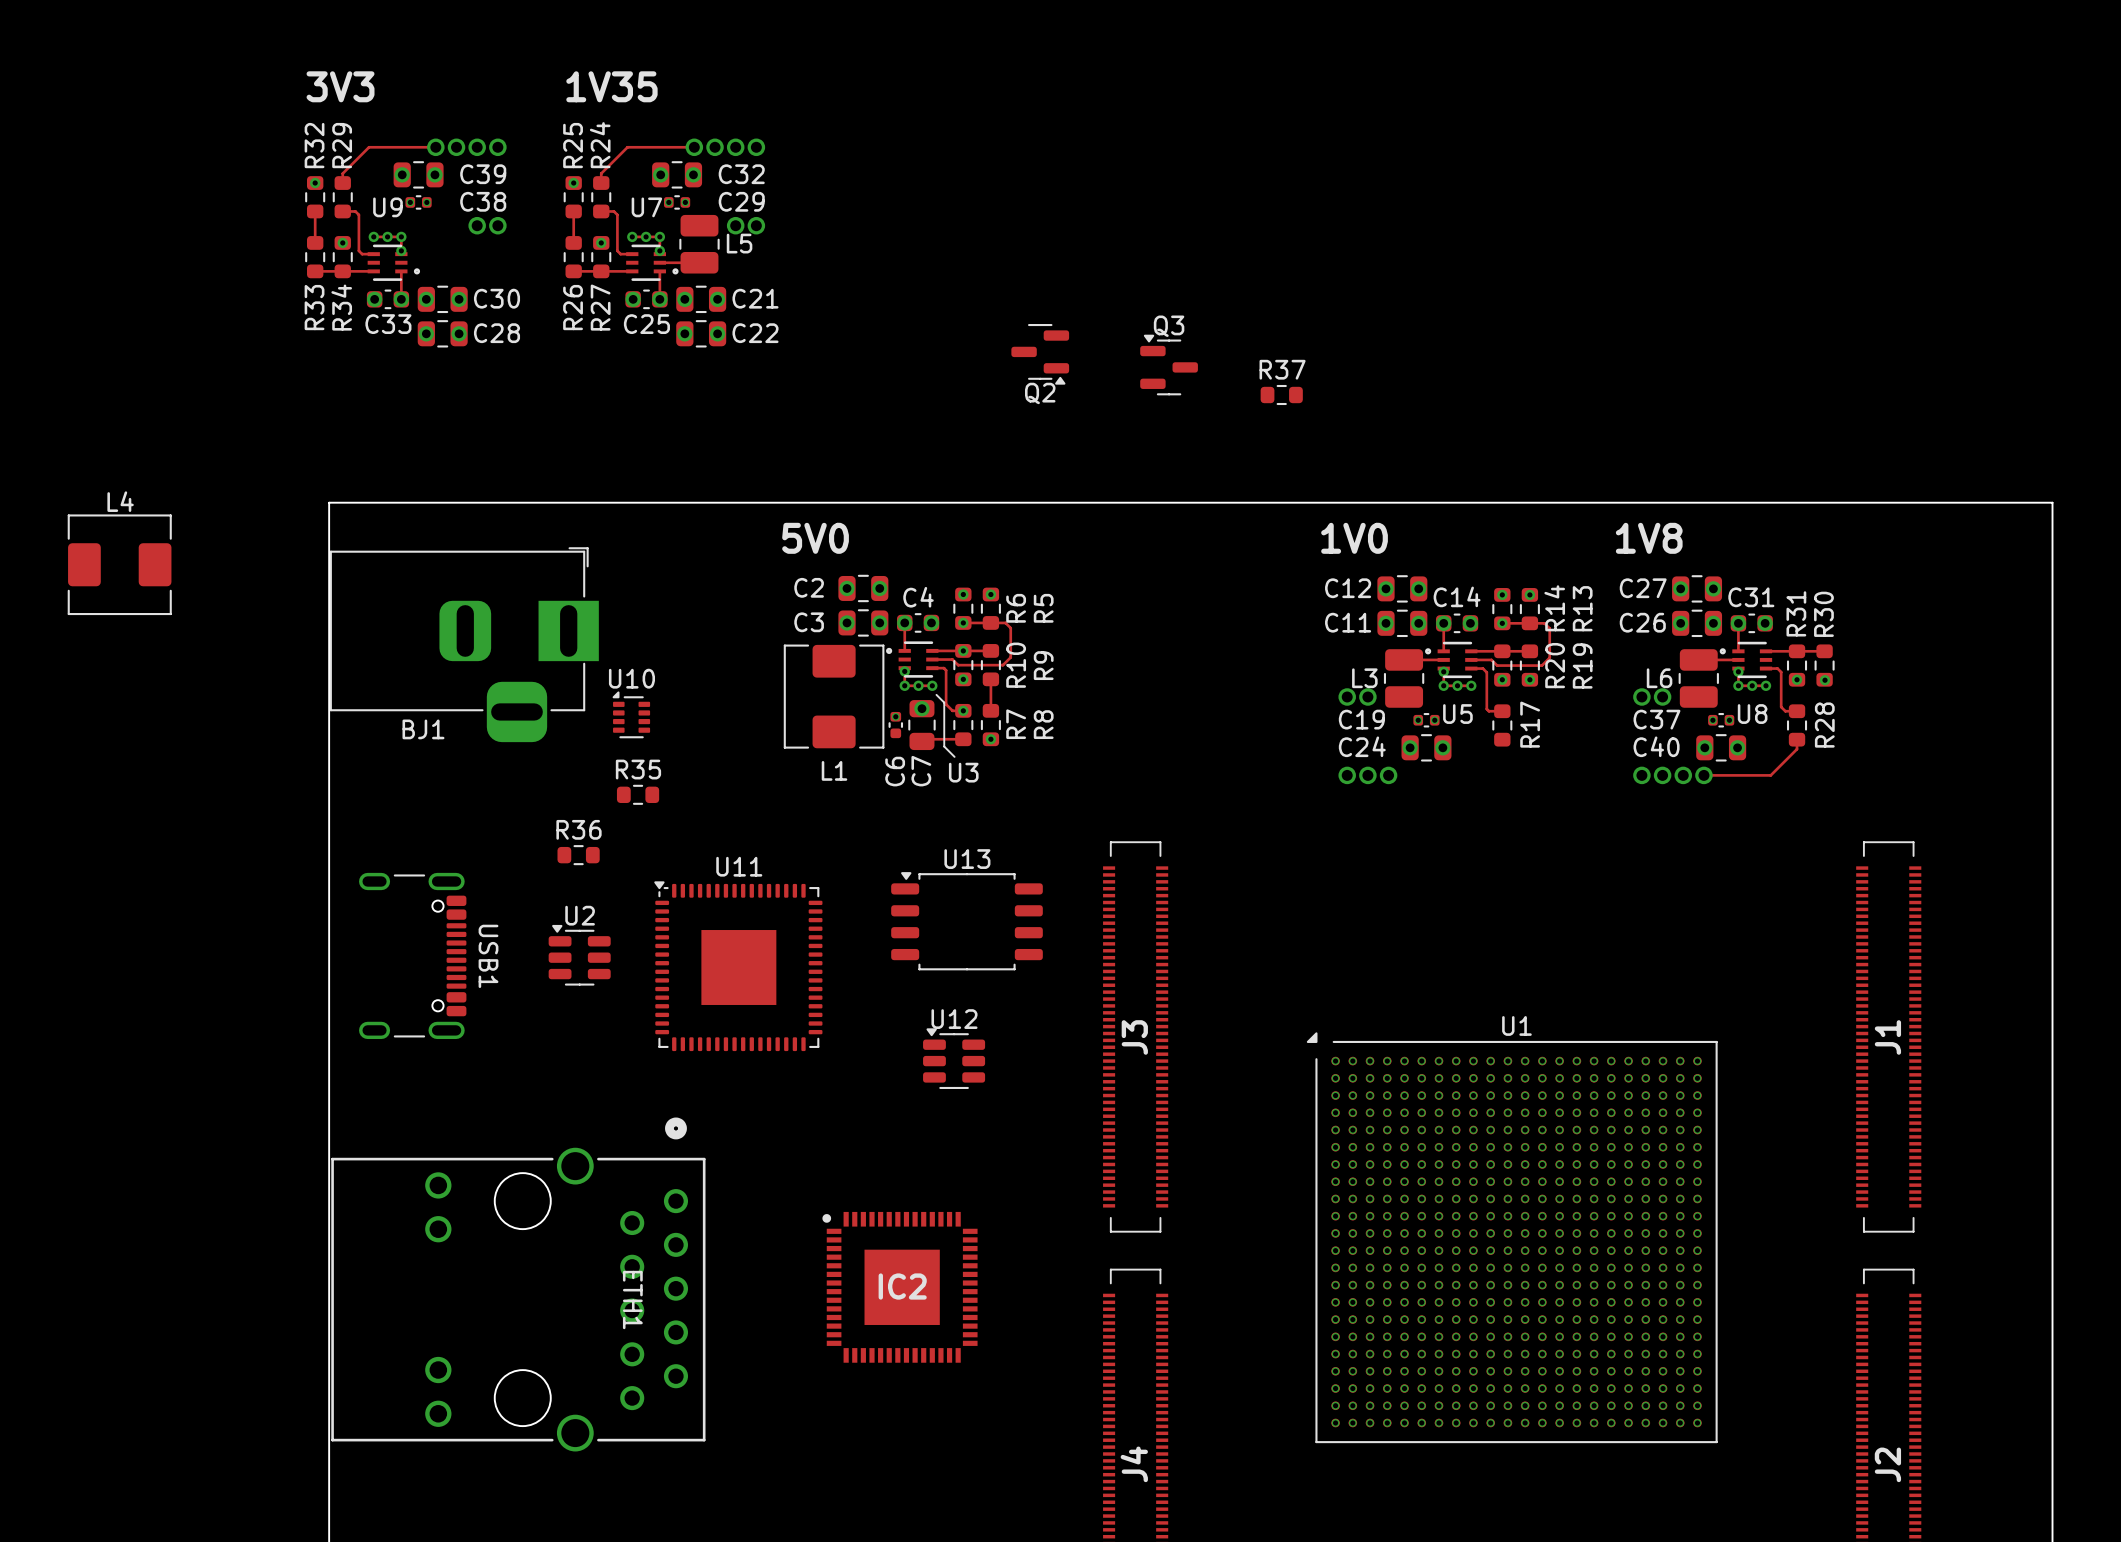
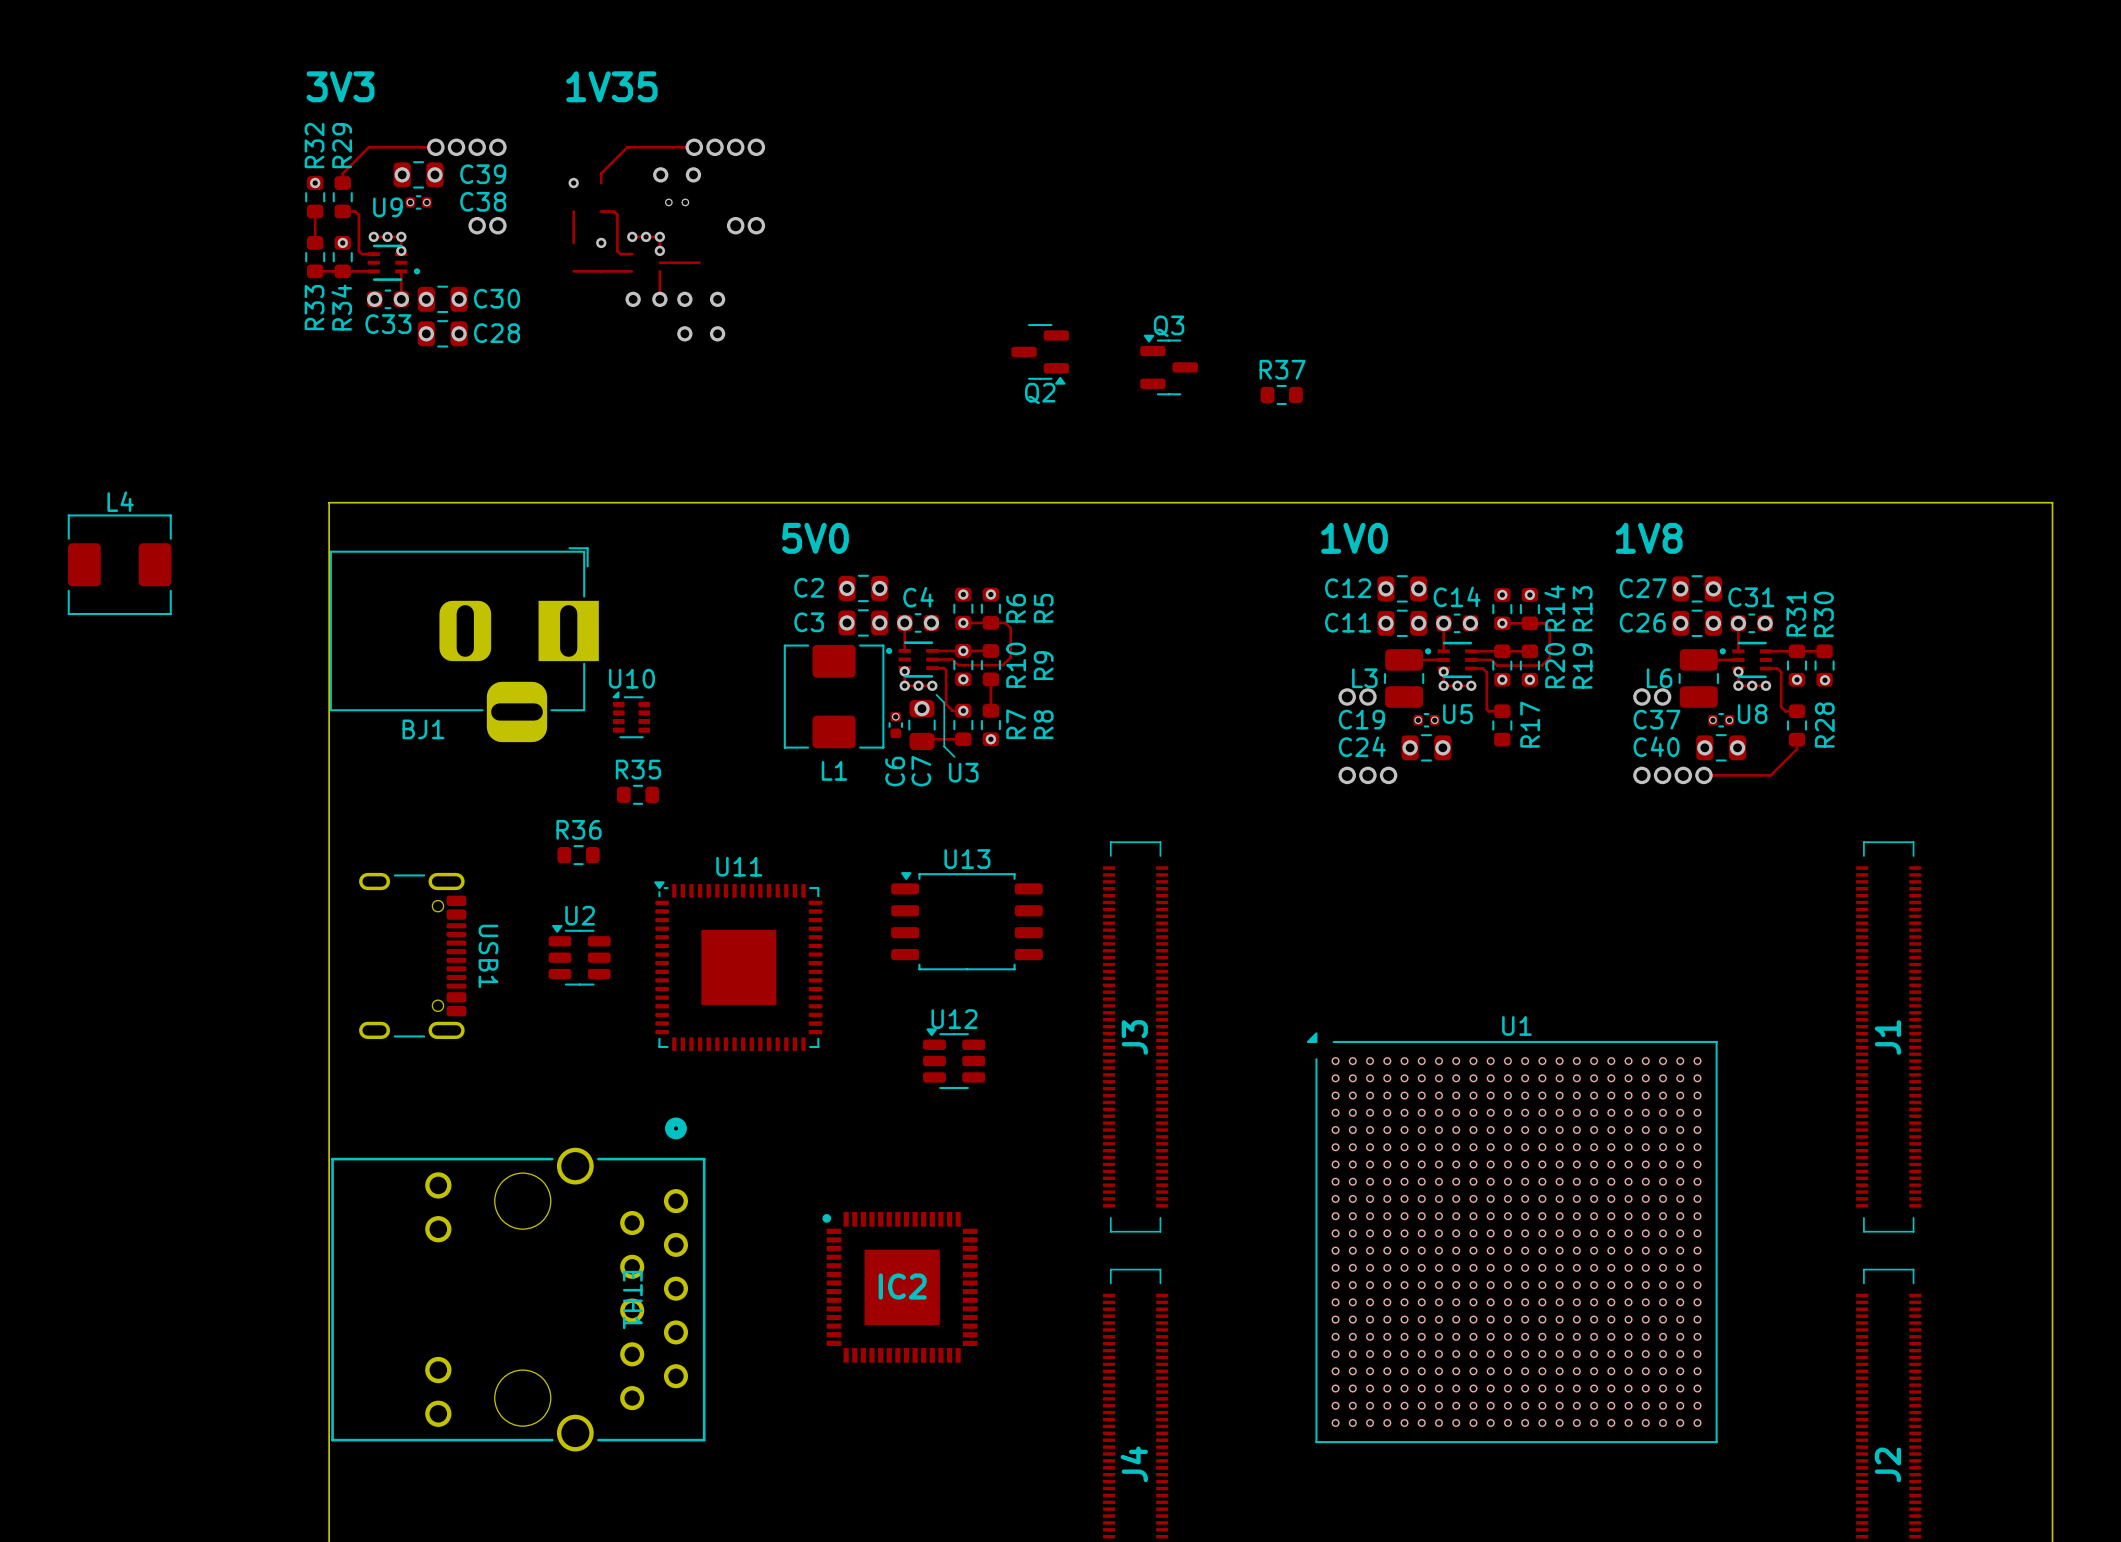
C32: (677, 174) -> none
R25: (573, 197) -> none
R24: (601, 197) -> none
C29: (677, 202) -> none
L5: (699, 244) -> none
R26: (573, 257) -> none
R27: (601, 257) -> none
U7: (652, 262) -> none
C25: (646, 299) -> none
C21: (701, 299) -> none
C22: (701, 333) -> none

